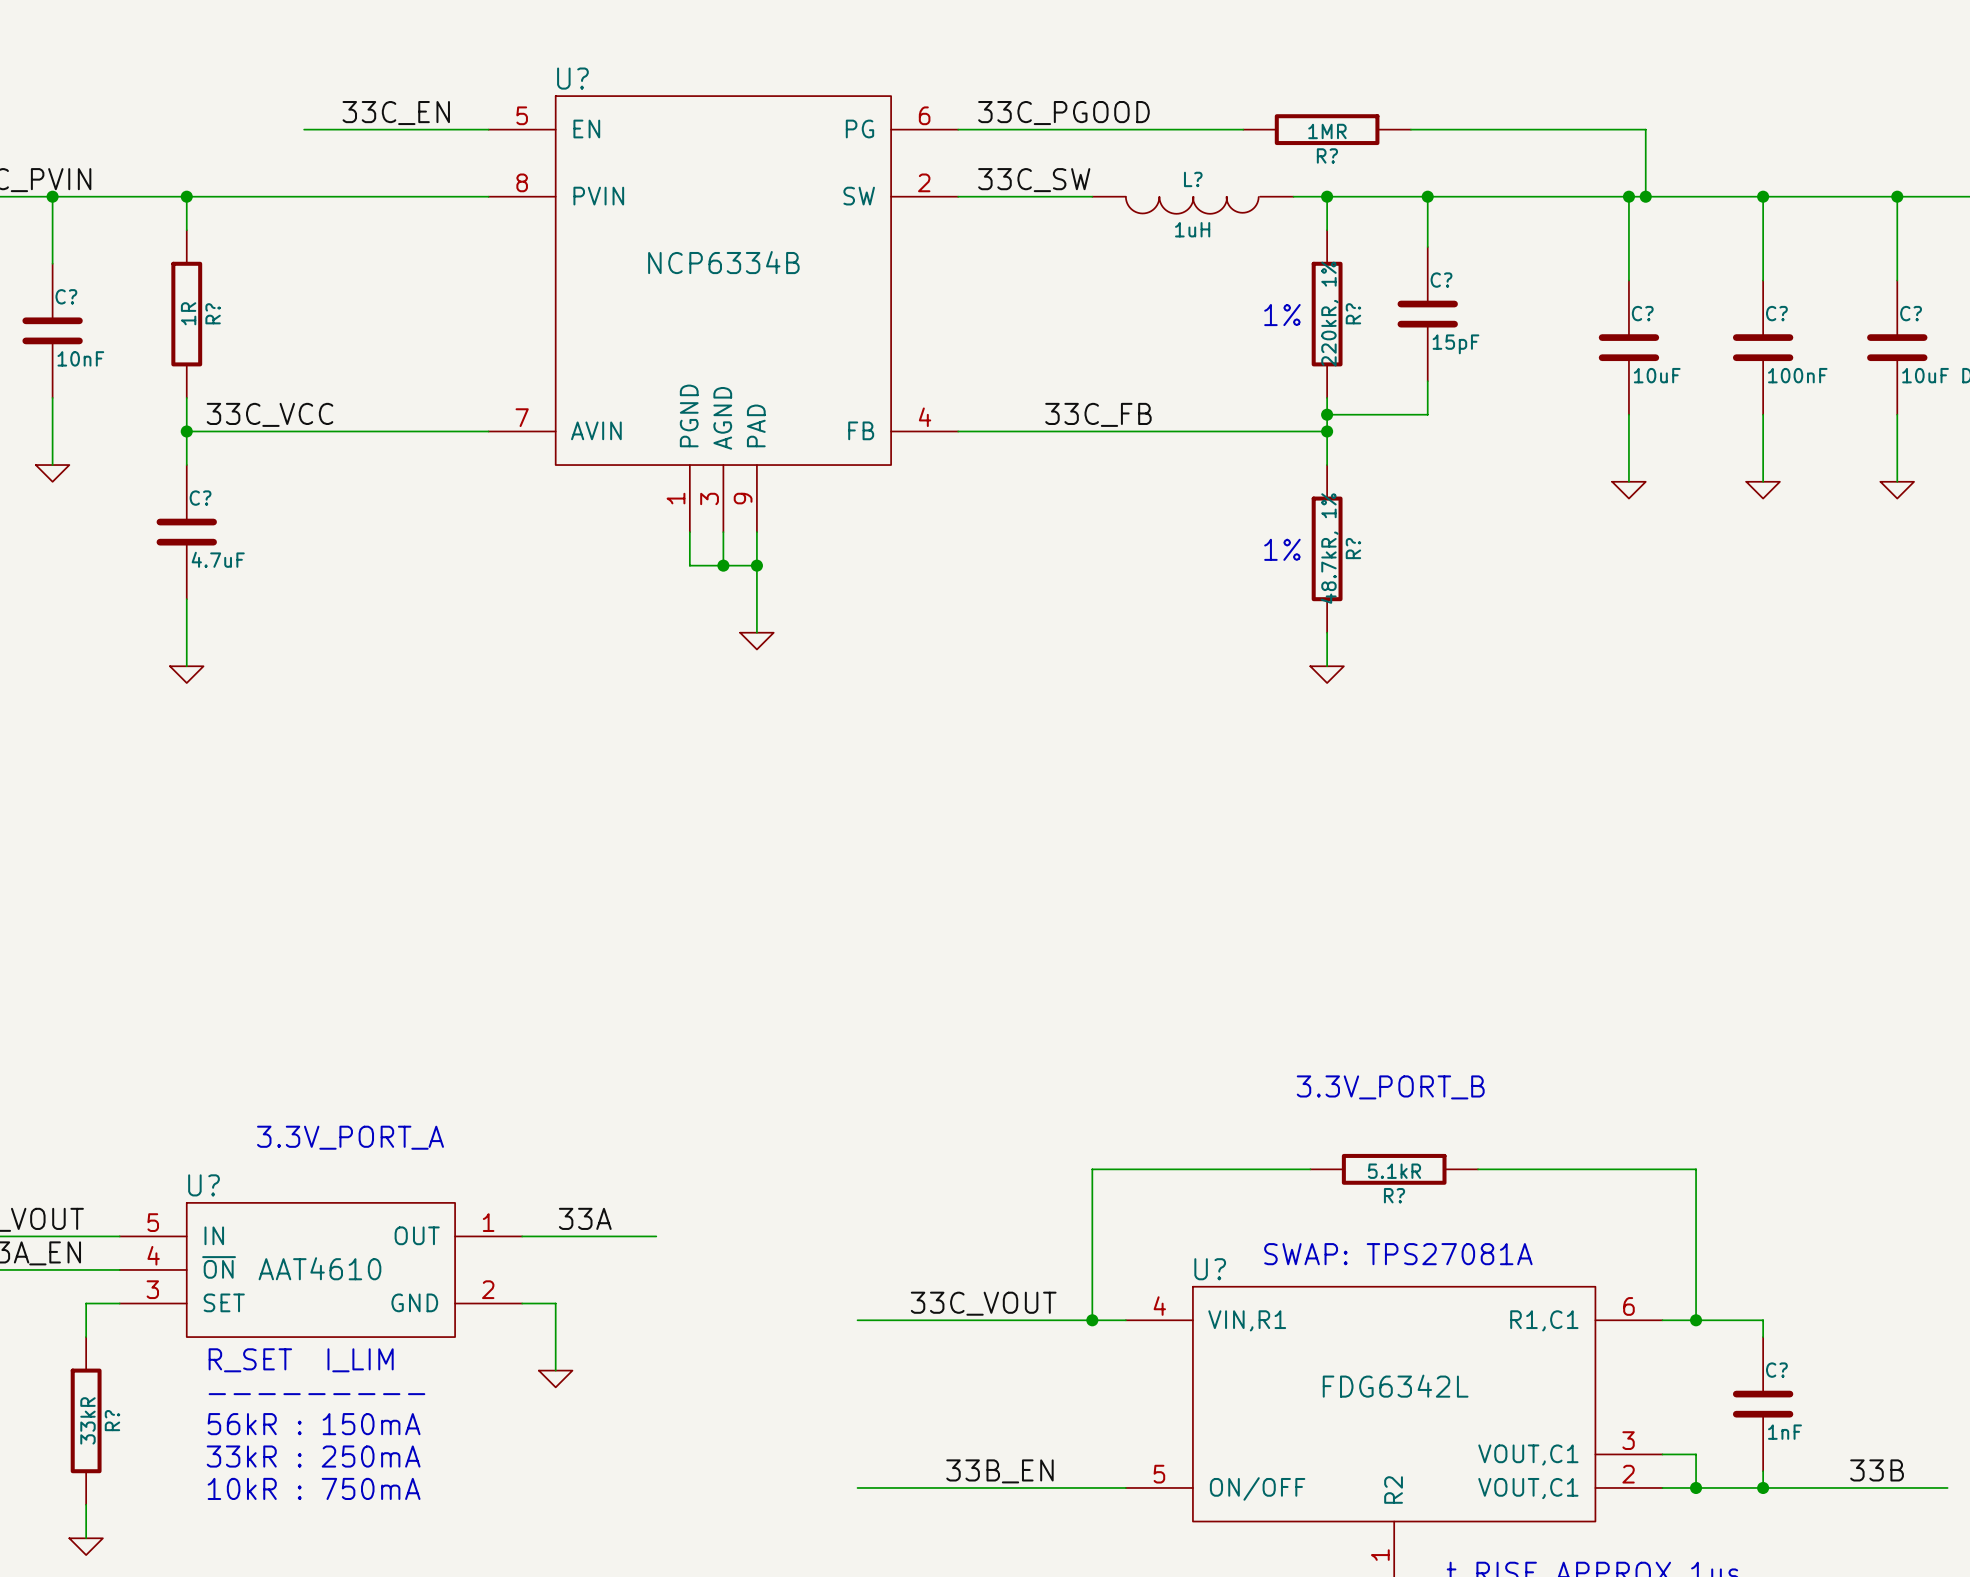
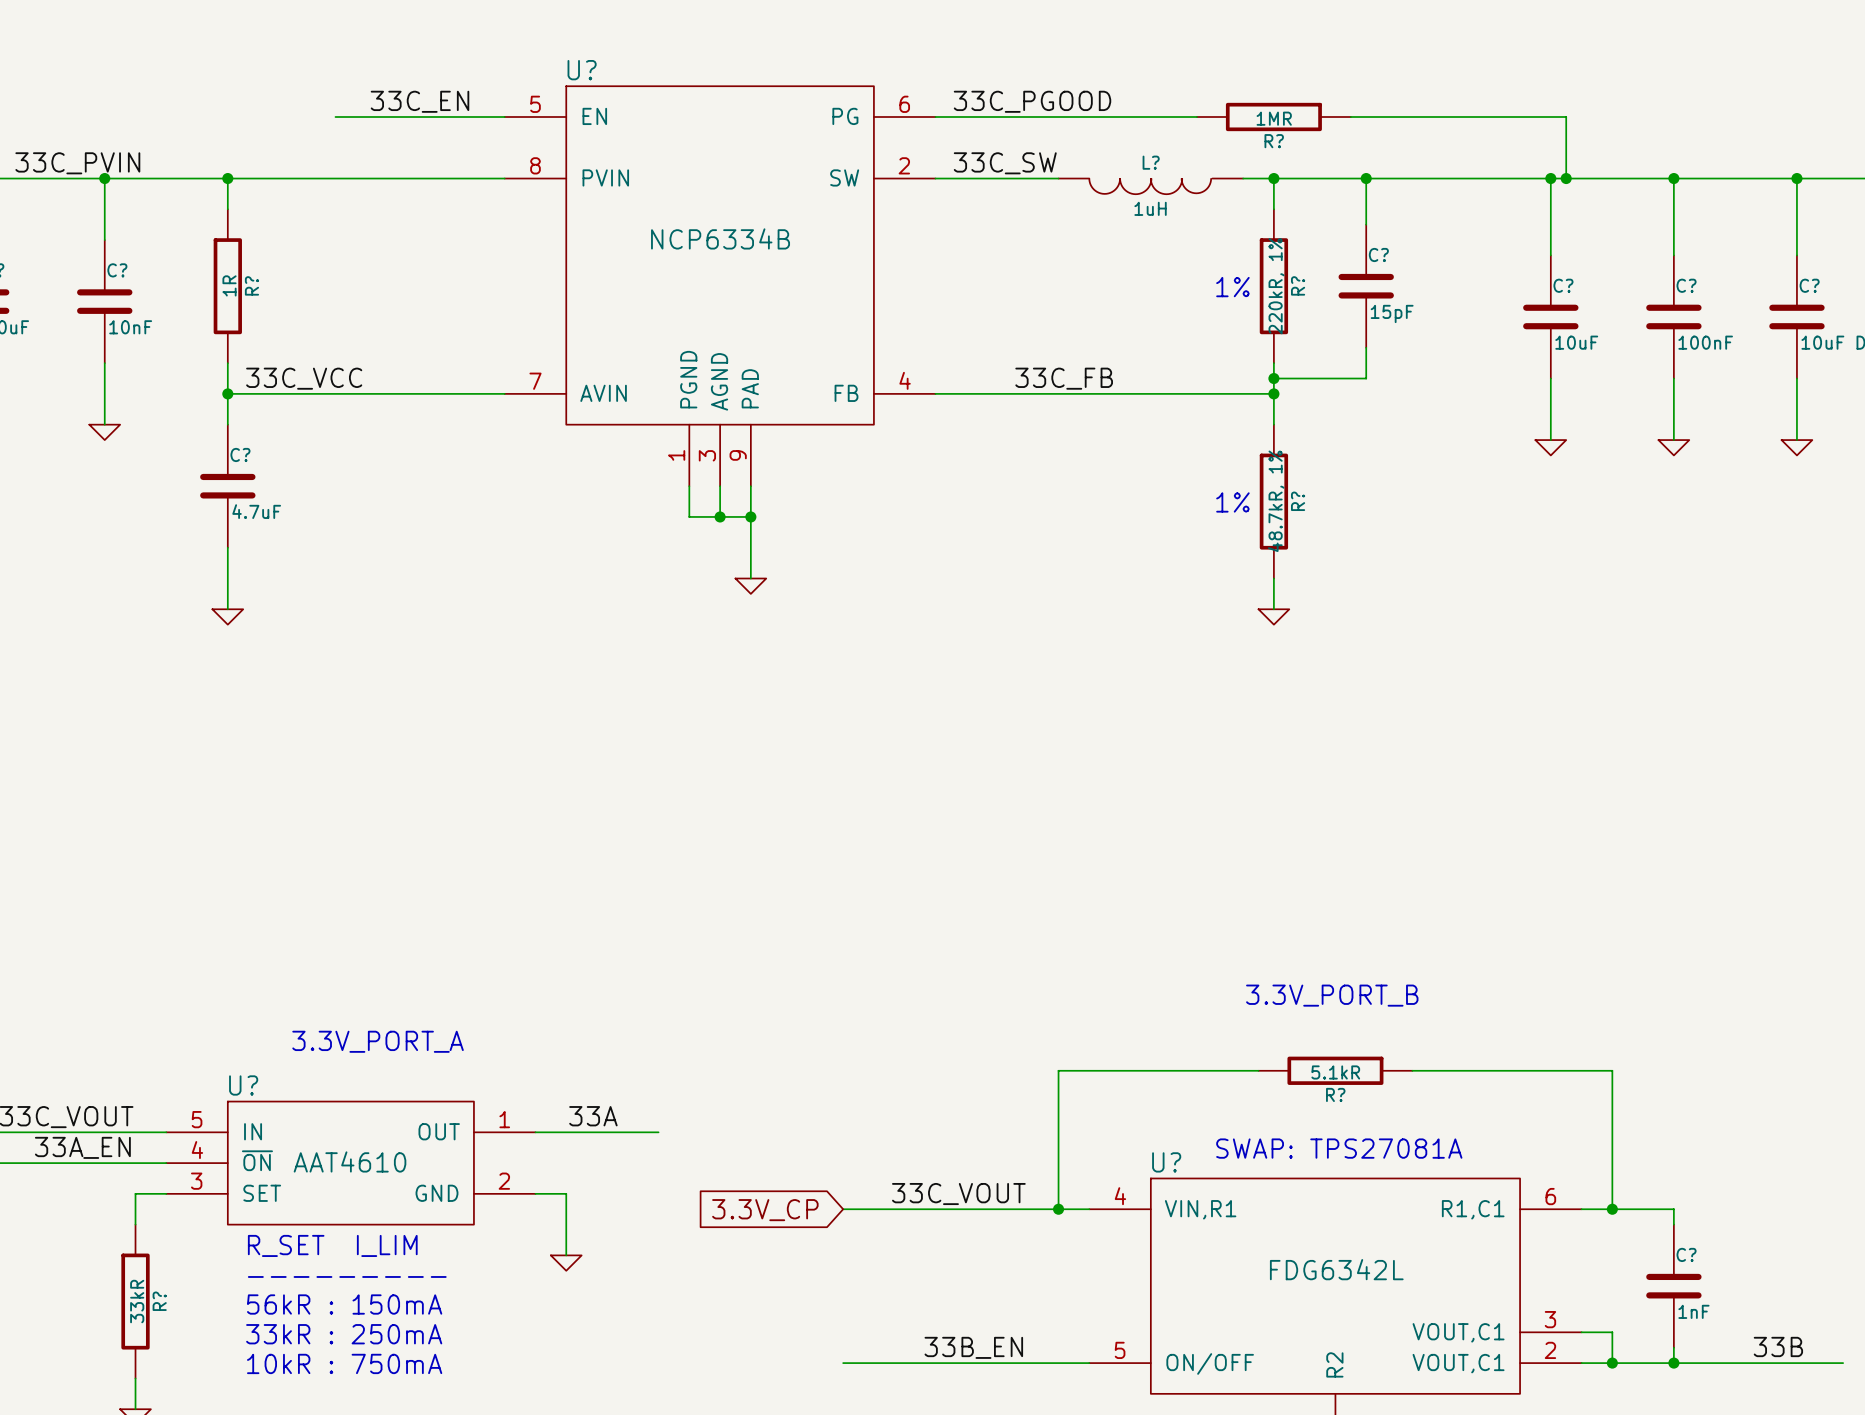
global label: none -> 3.3V_CP (765, 1210)

